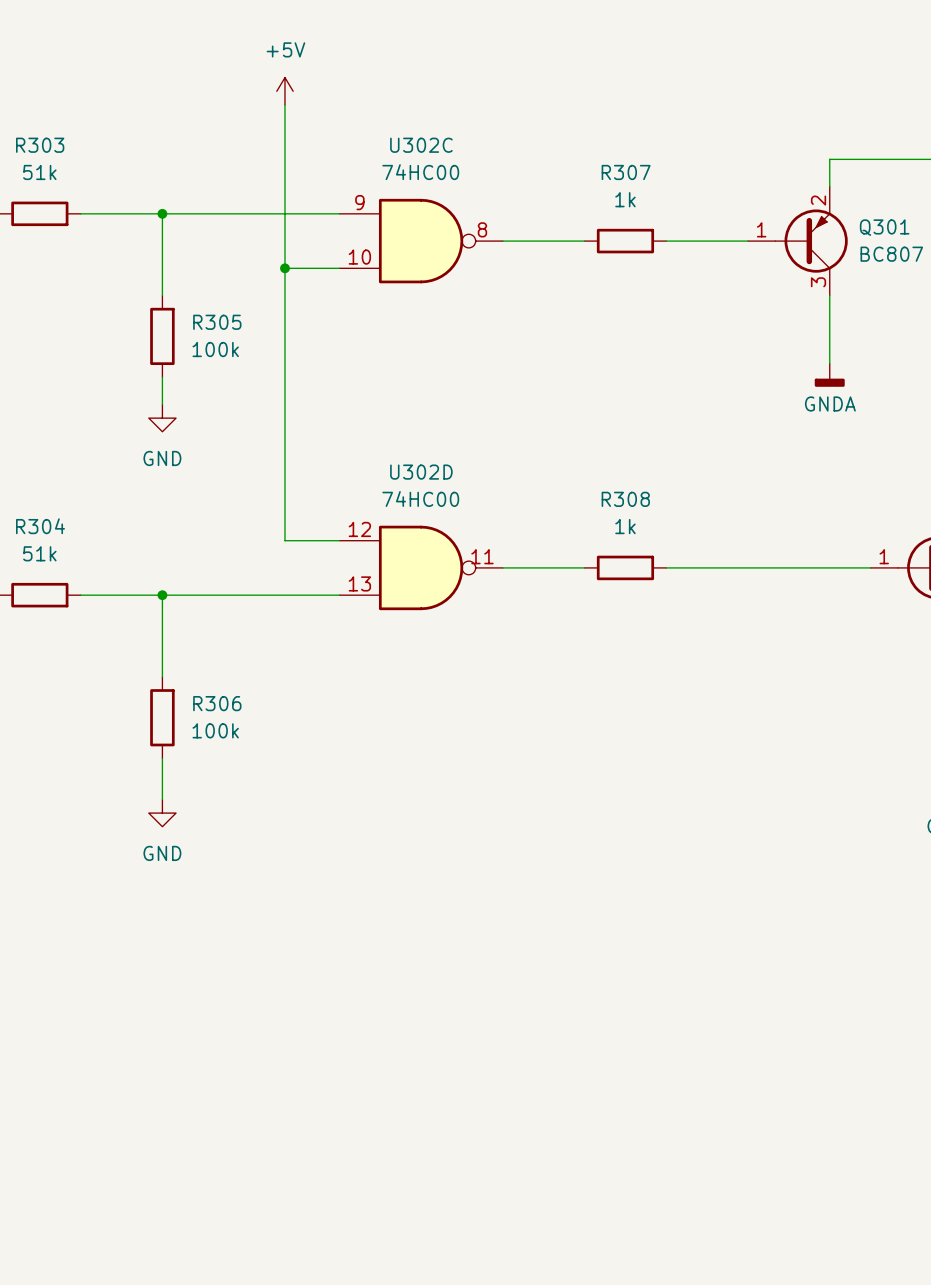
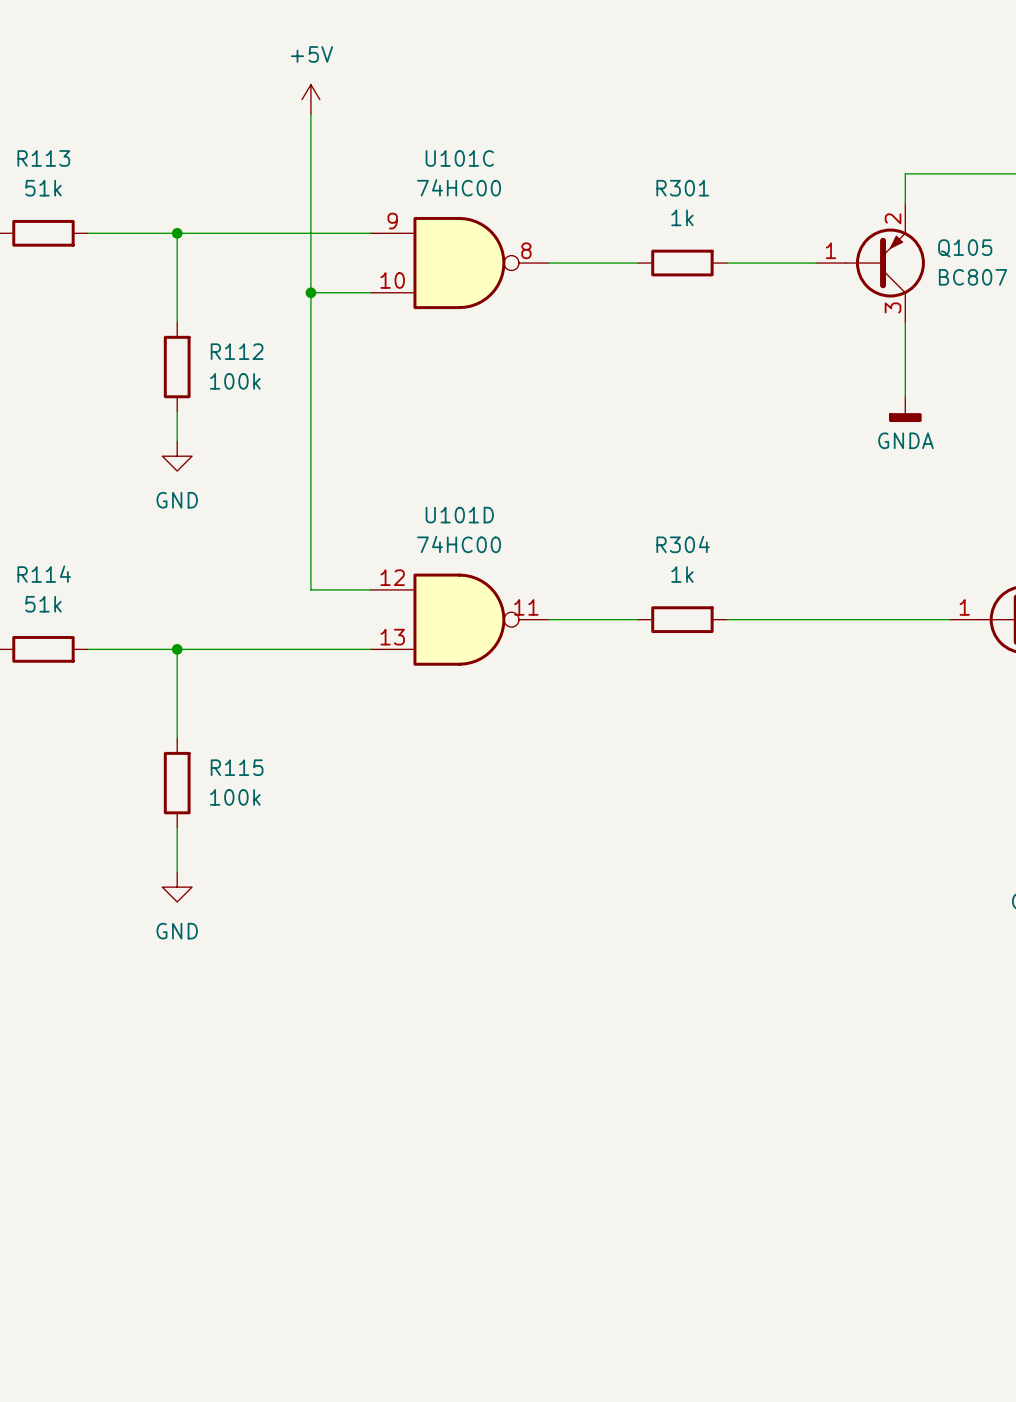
R303 name: R303 (40, 145) -> R113 (43, 158)
U302C name: U302C (421, 145) -> U101C (459, 158)
R307 name: R307 (626, 172) -> R301 (682, 188)
Q301 name: Q301 (884, 227) -> Q105 (965, 248)
R305 name: R305 (217, 322) -> R112 (237, 351)
U302D name: U302D (421, 472) -> U101D (459, 515)
R308 name: R308 (625, 499) -> R304 (683, 544)
R304 name: R304 (40, 526) -> R114 (44, 574)
R306 name: R306 (217, 703) -> R115 (237, 767)

